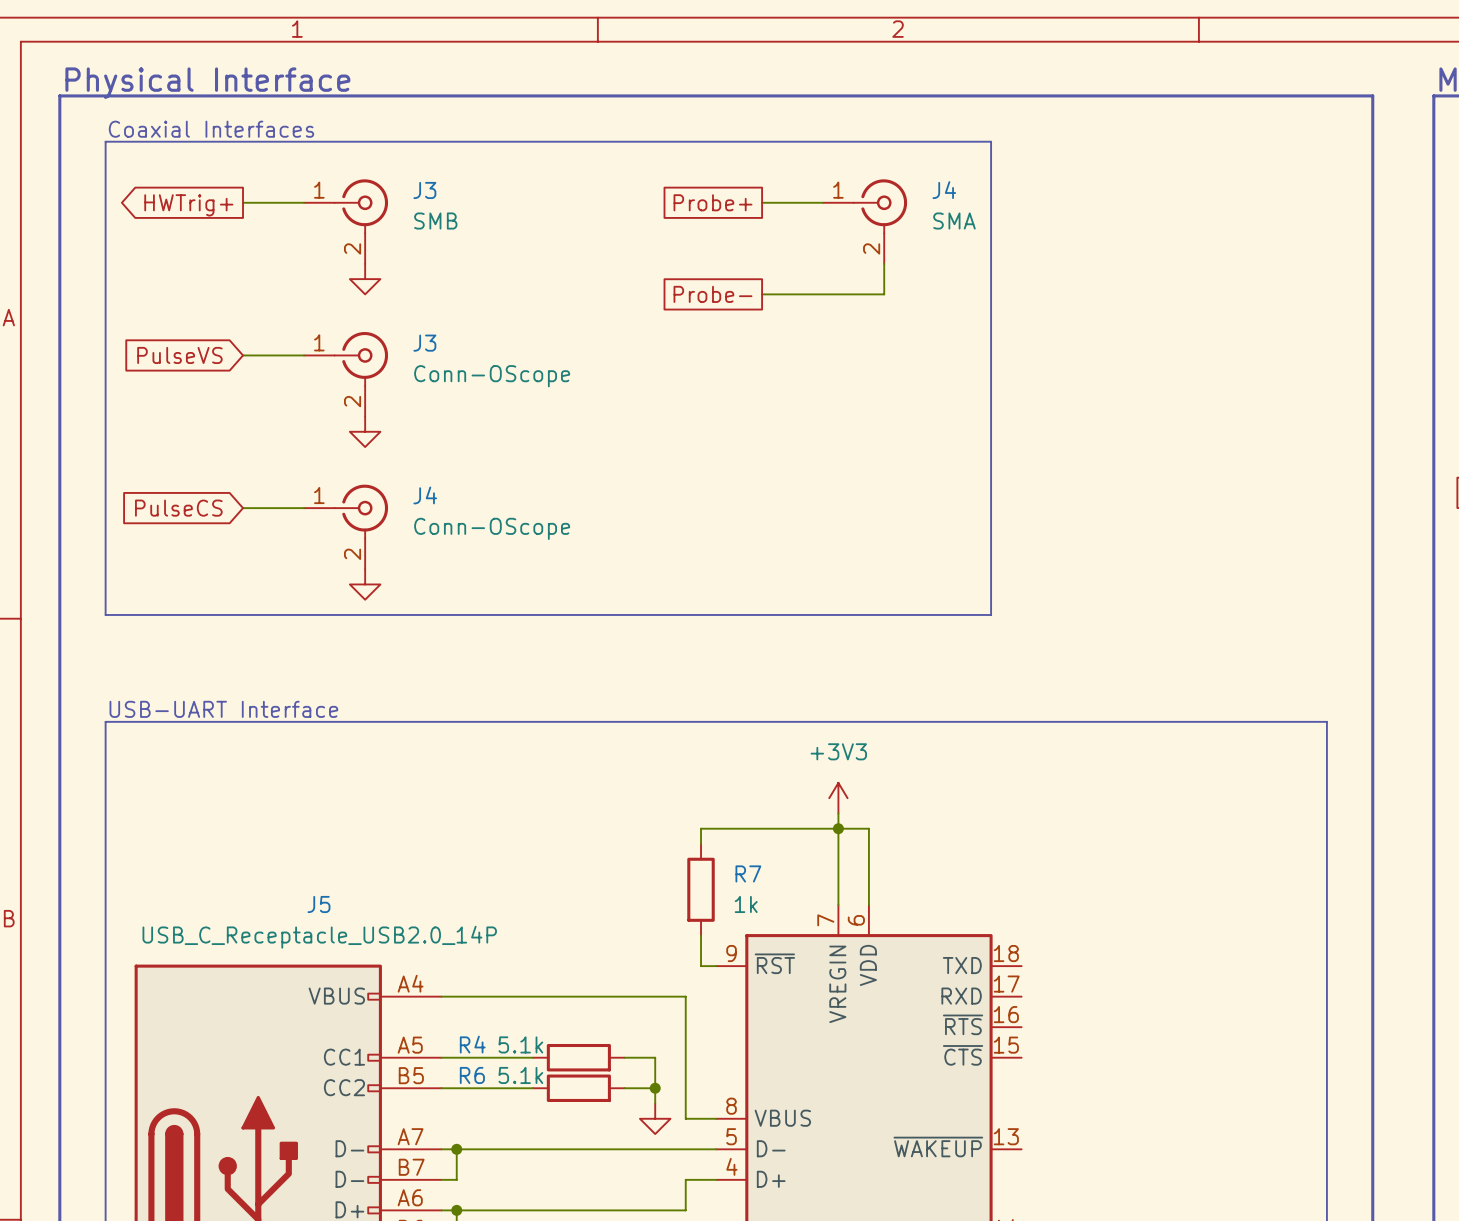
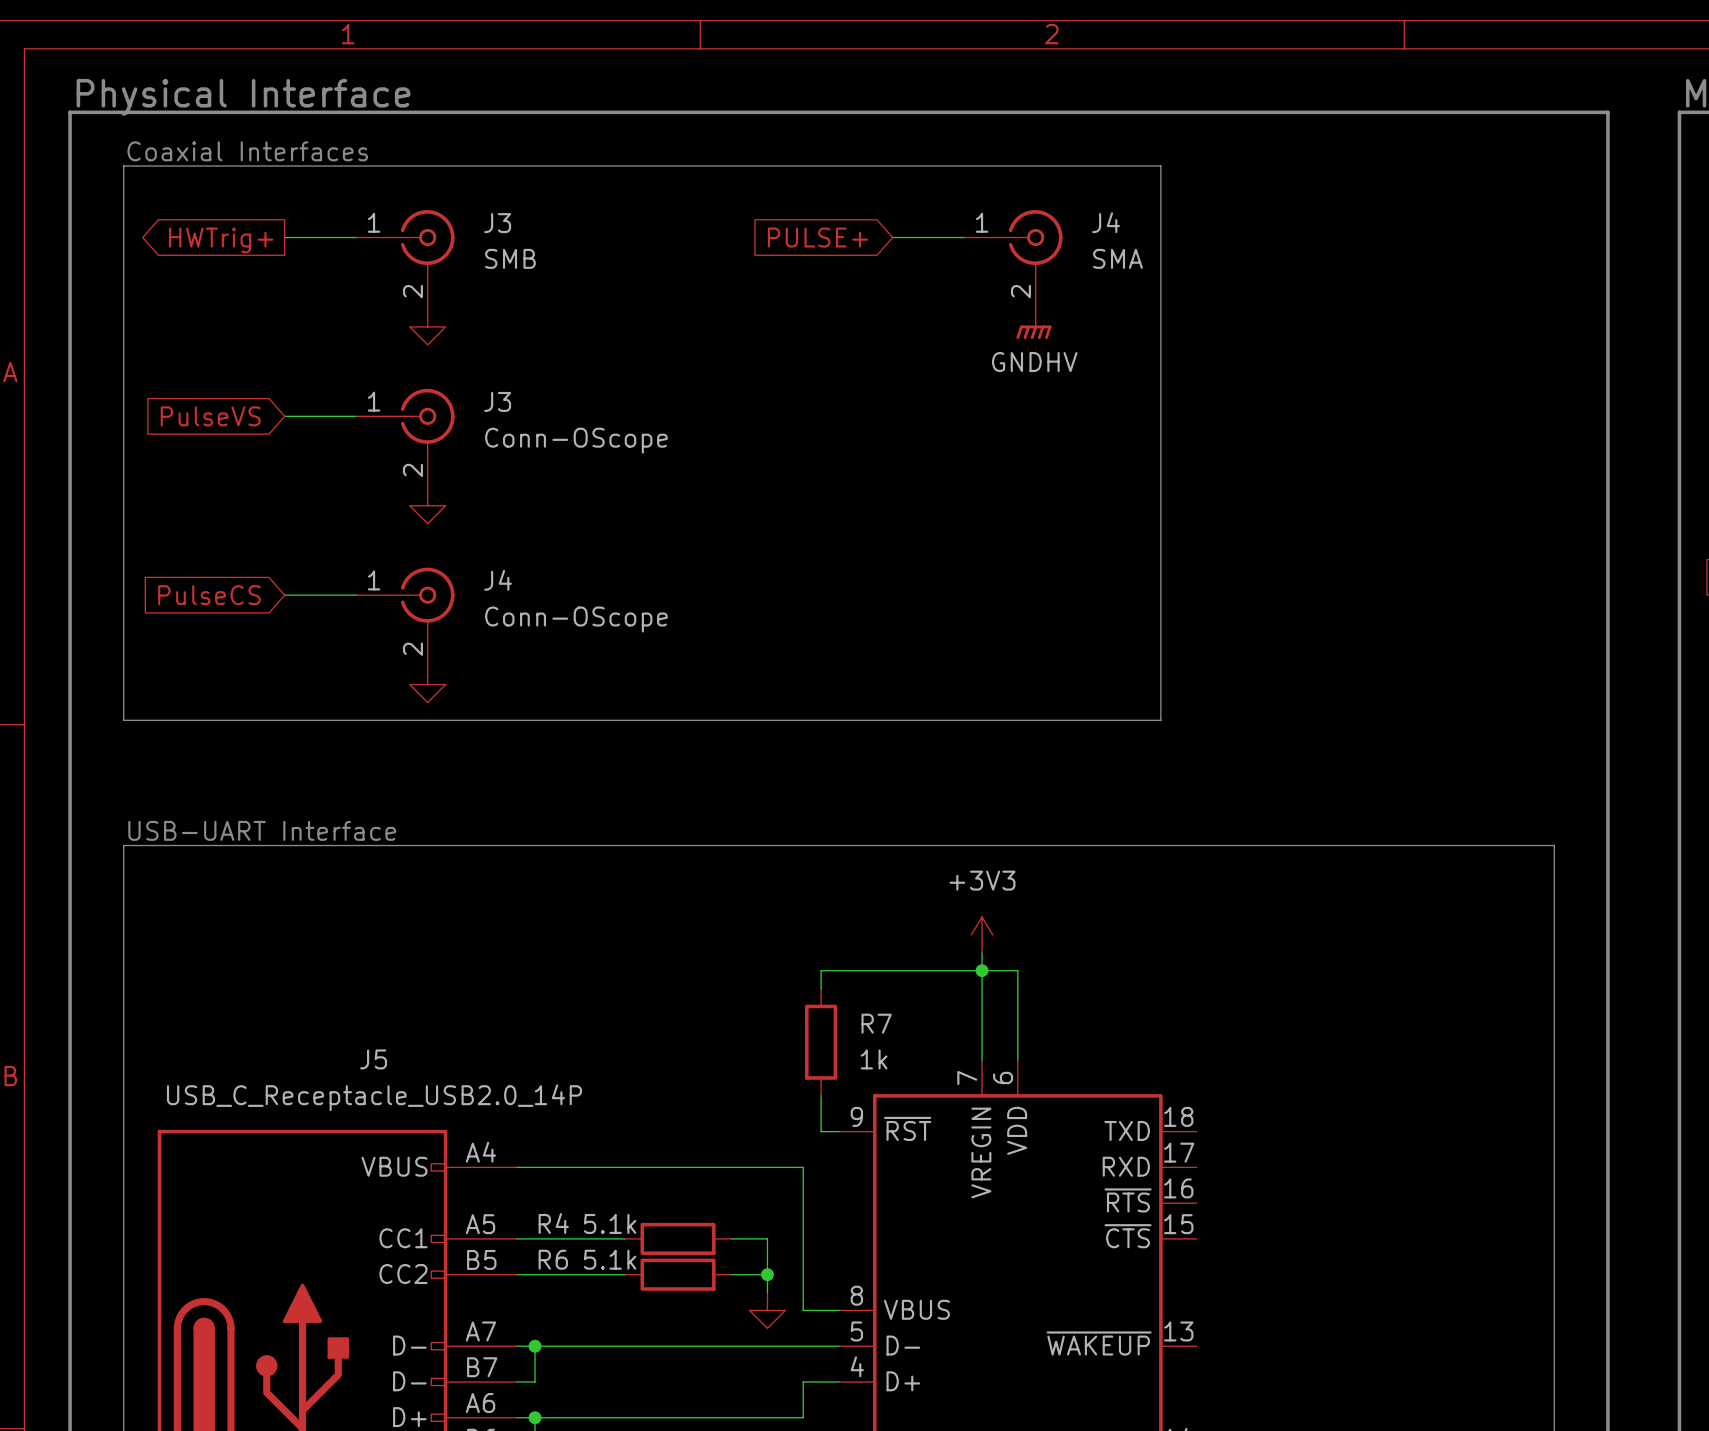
global label shape: passive (712, 202) -> input (817, 237)
global label: Probe+ (712, 202) -> PULSE+ (817, 237)
wire: (884, 263) (884, 294) (762, 294) -> none
power symbol: none -> GNDHV (1033, 324)
global label: Probe- (712, 294) -> none

